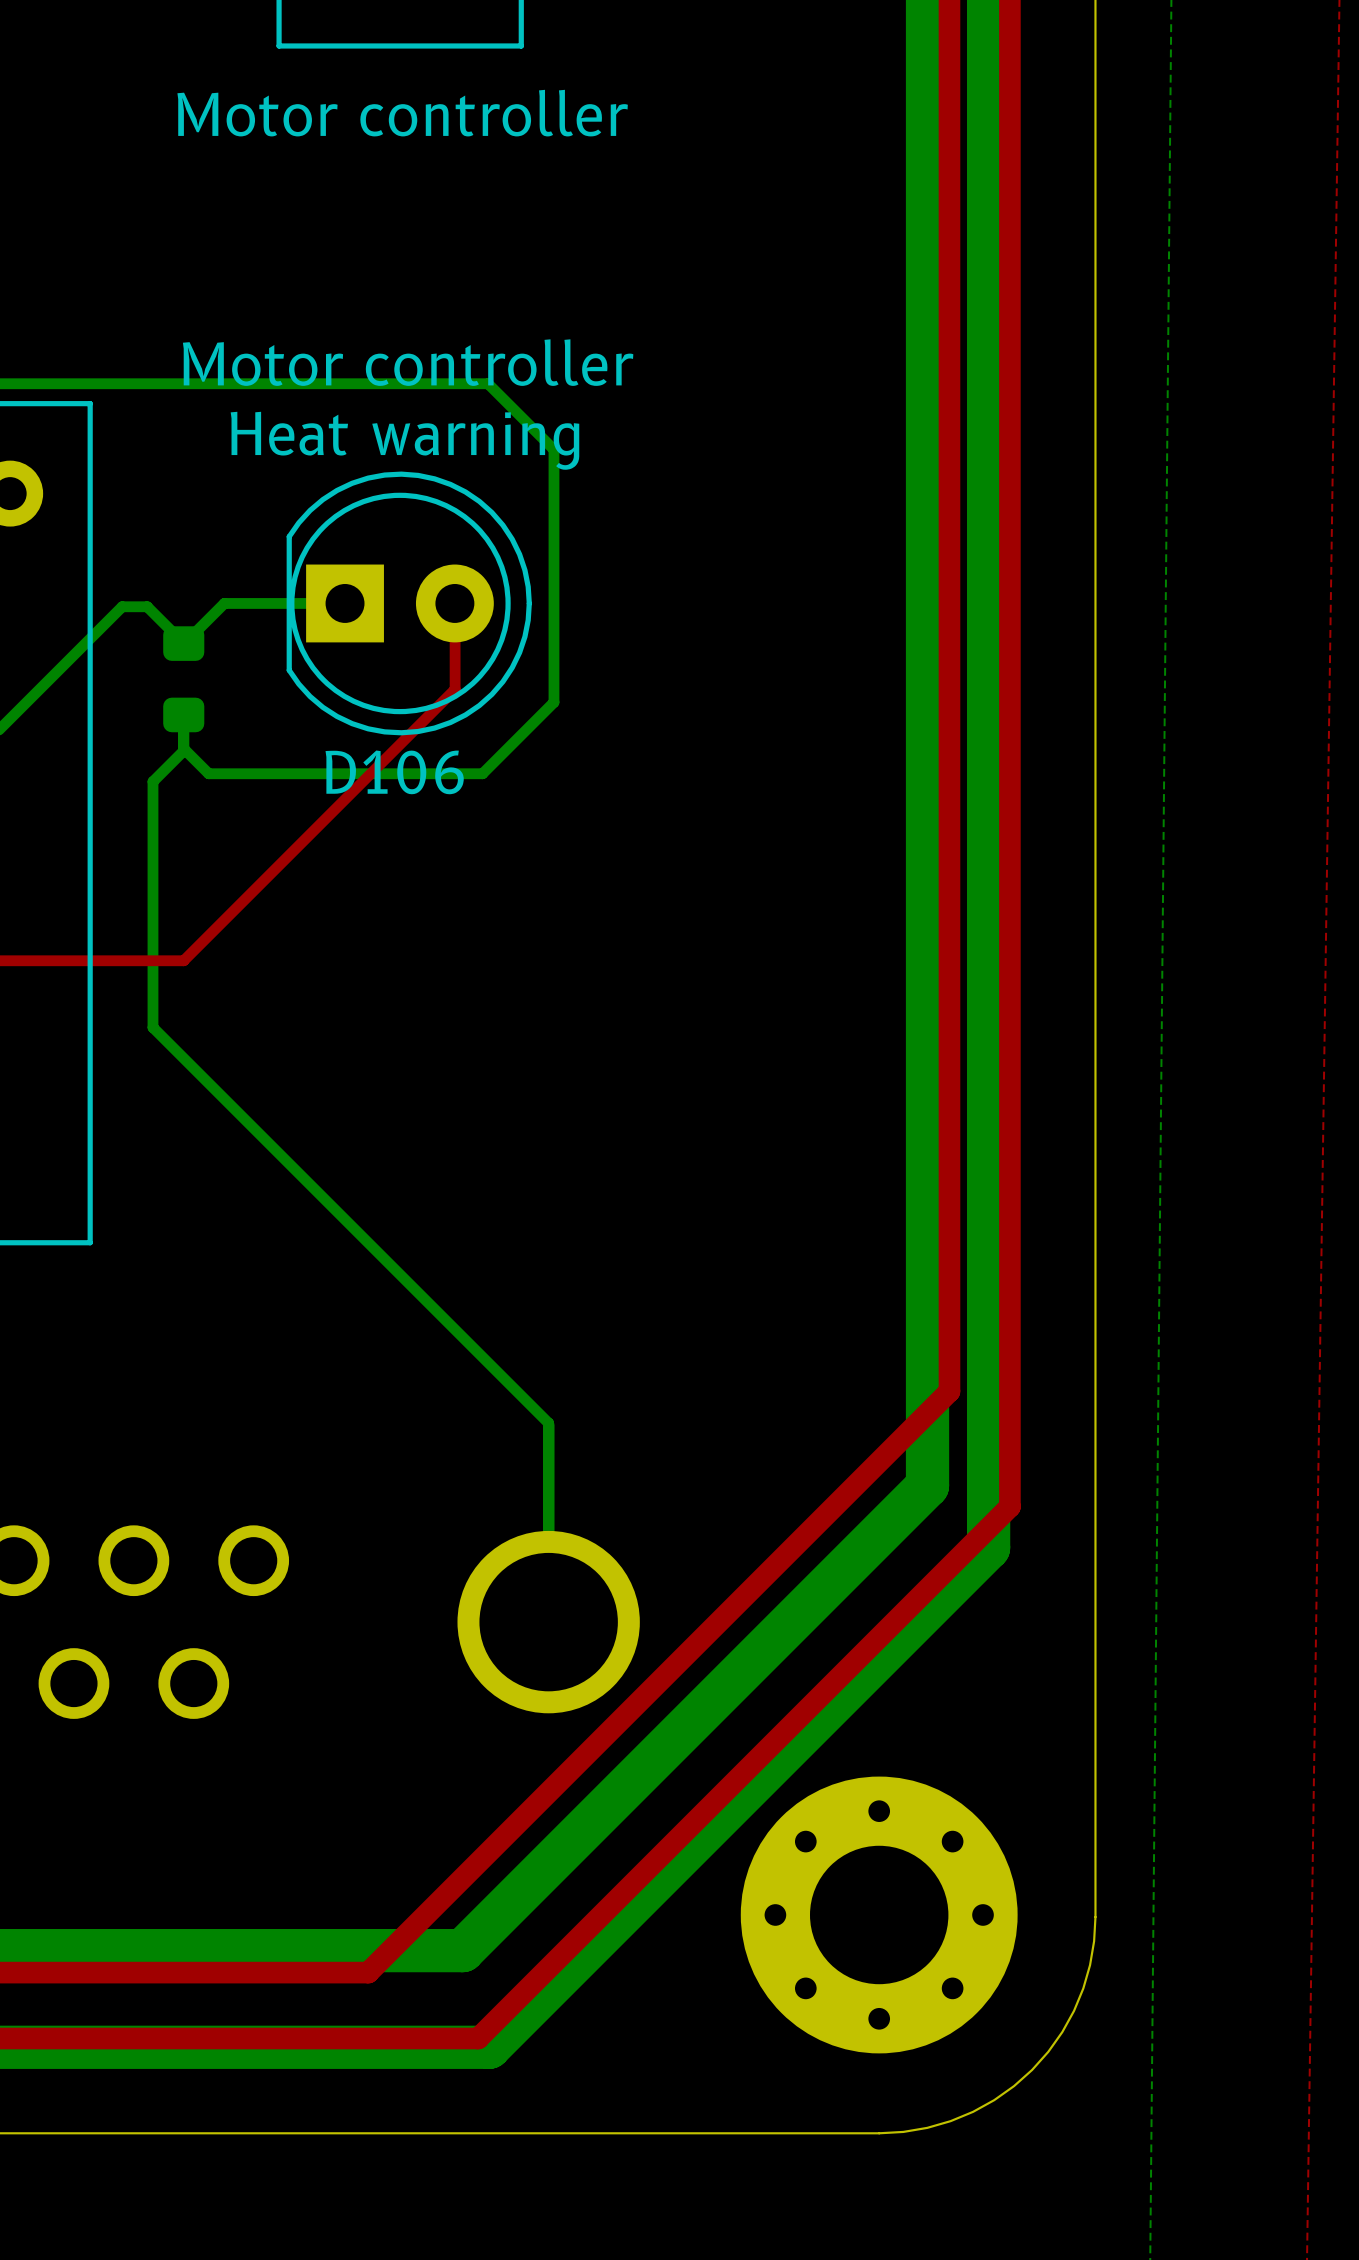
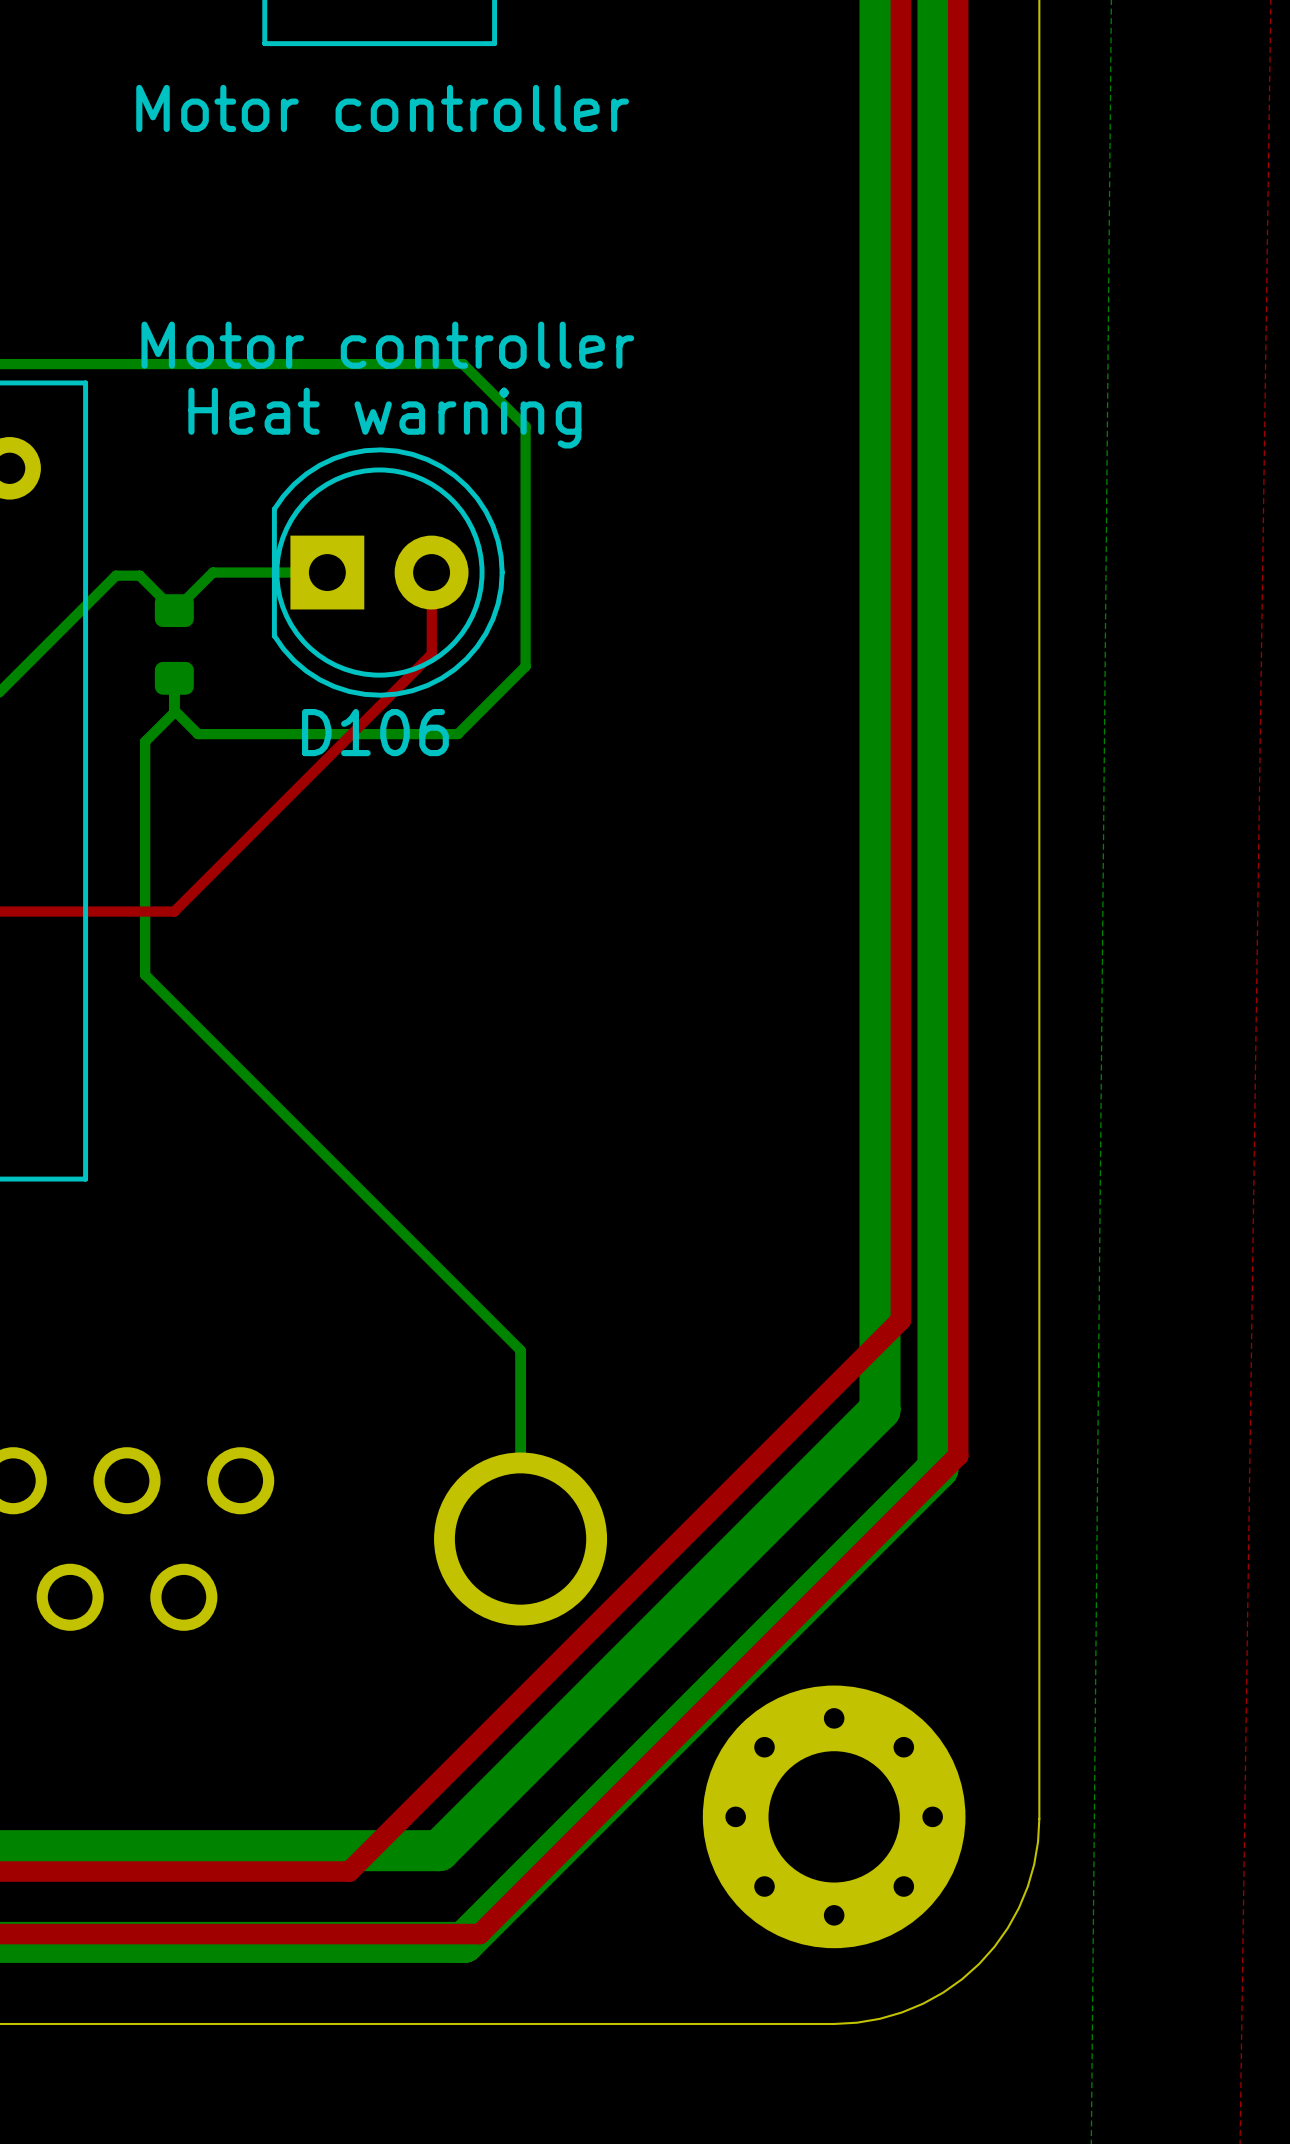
top track: (1009, 1506) (478, 2038) -> (958, 1429) (958, 1455) (479, 1934) (453, 1934)

